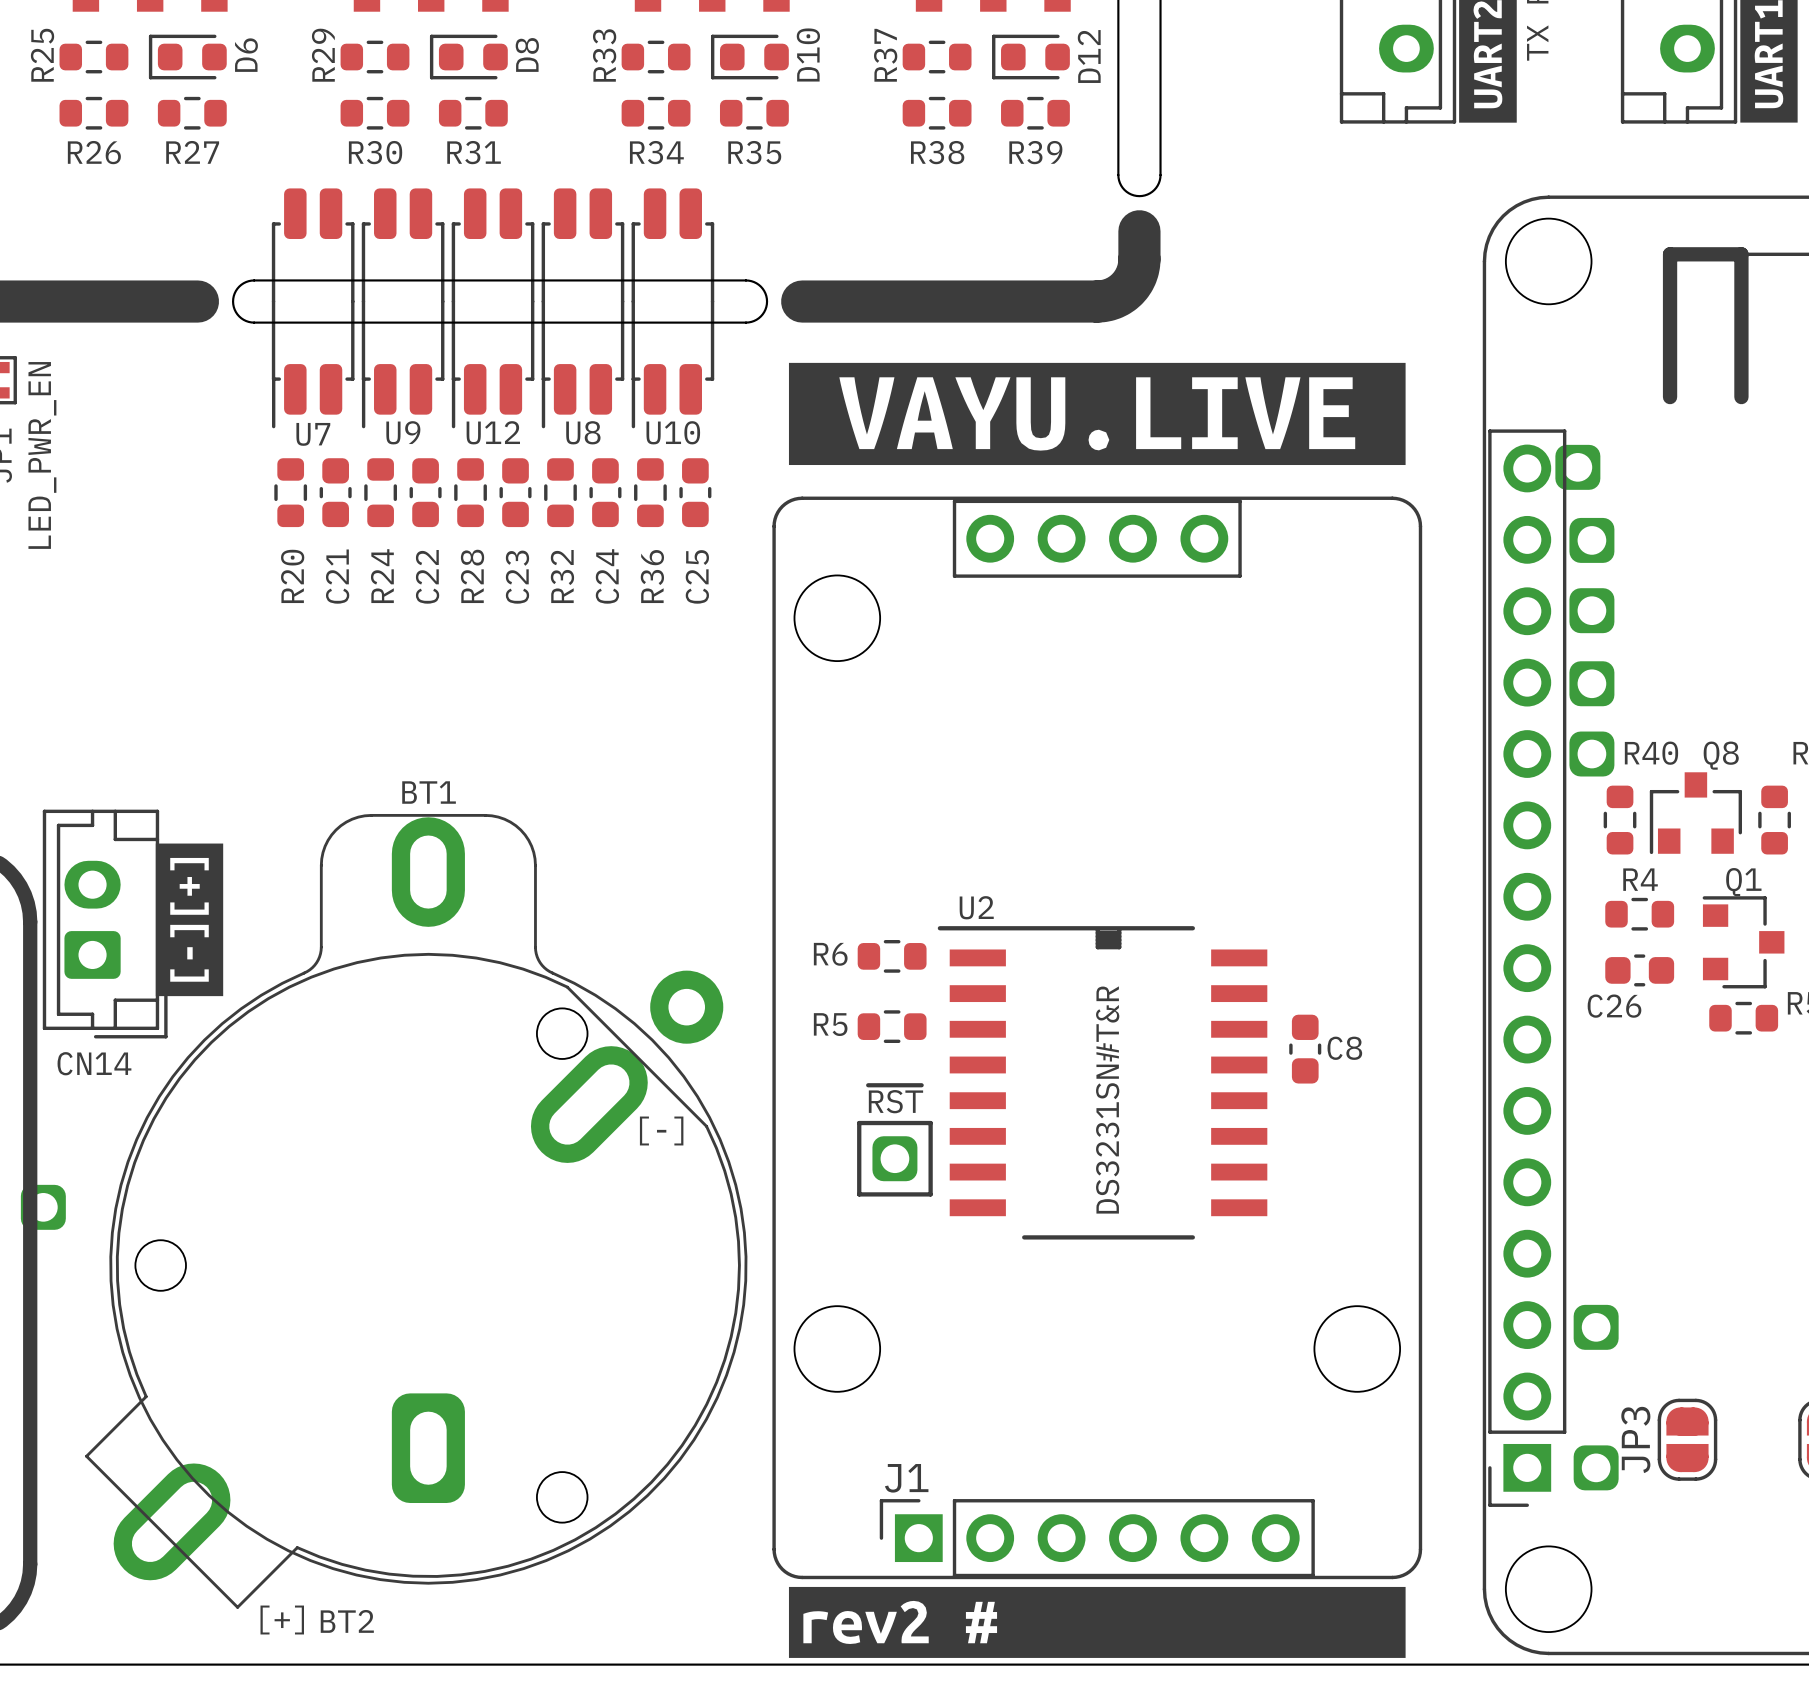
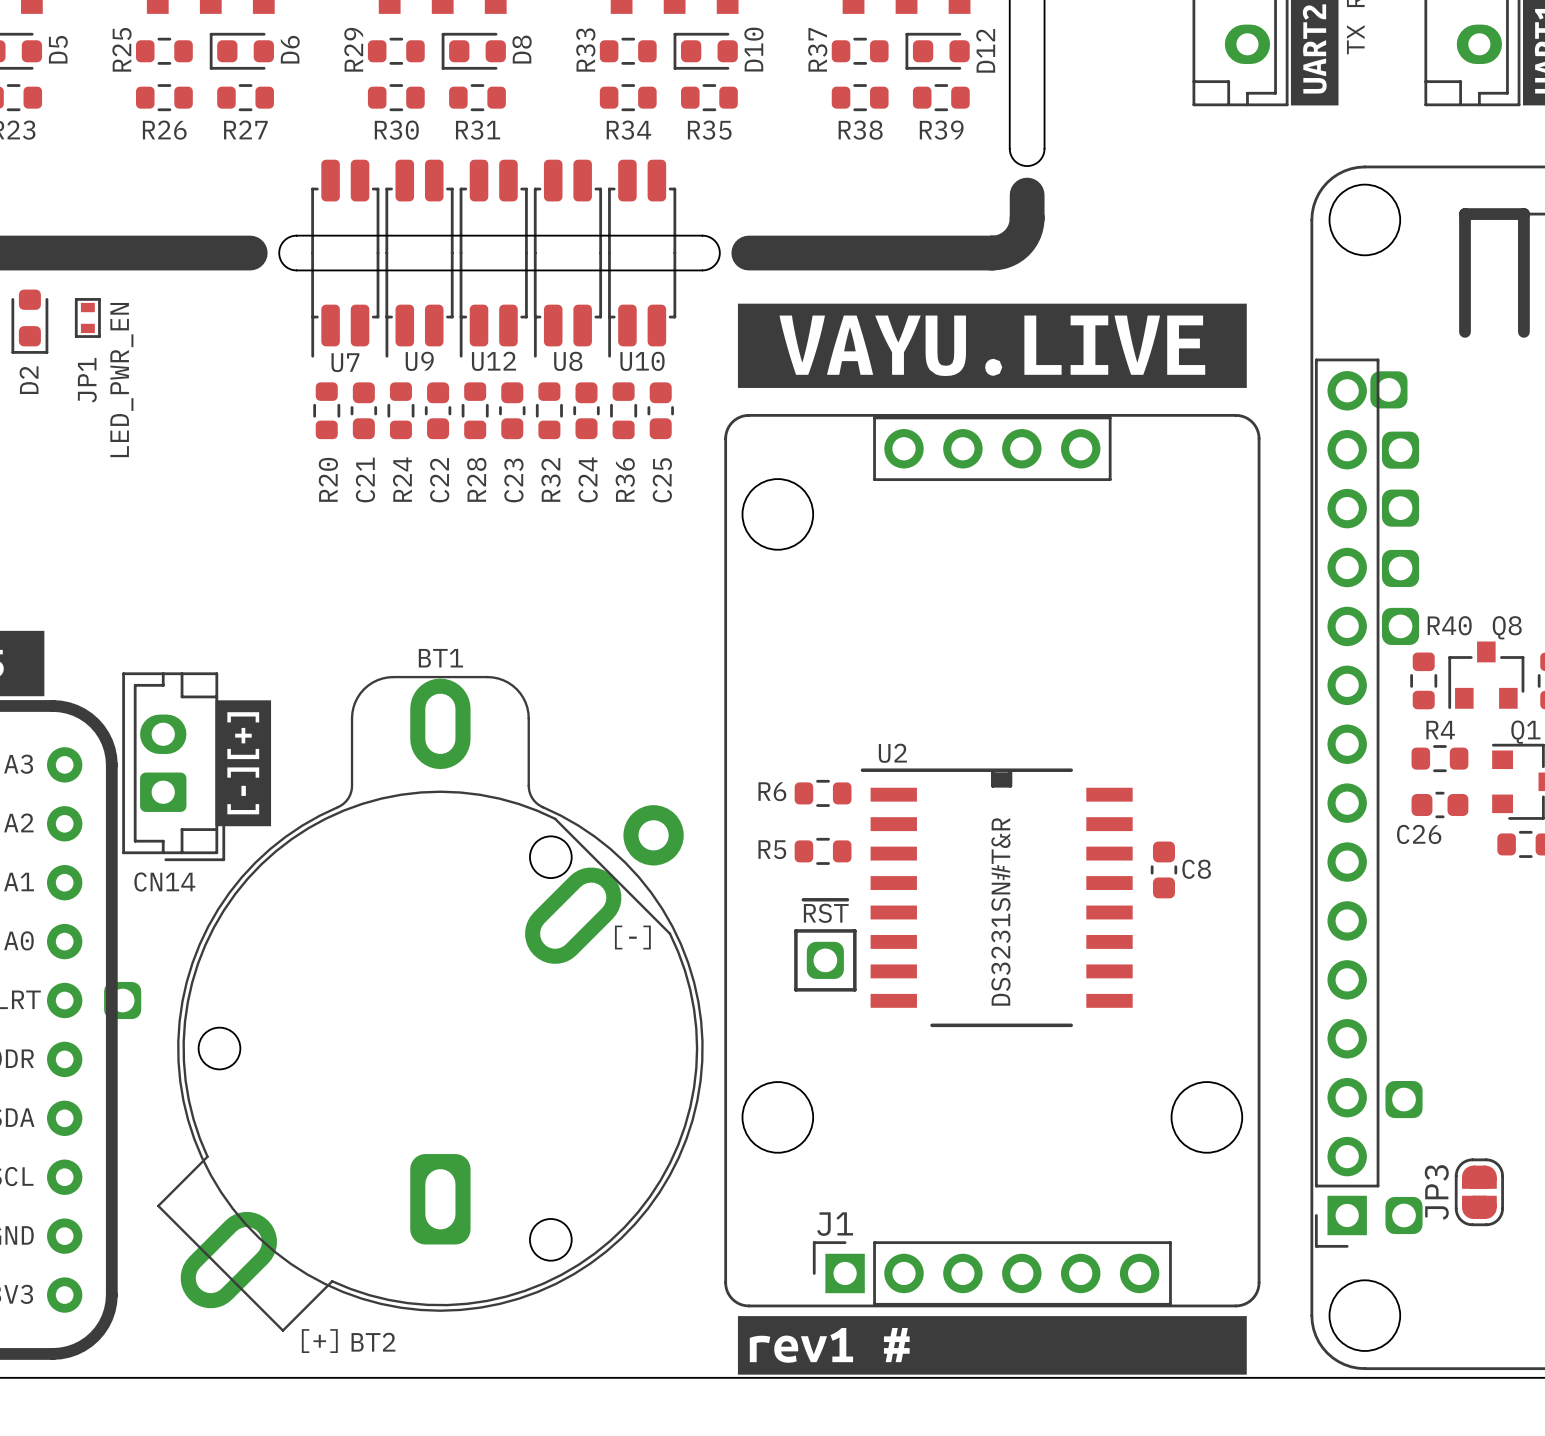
drawing shape: [788, 1586, 1406, 1658] -> [737, 1316, 1247, 1375]

